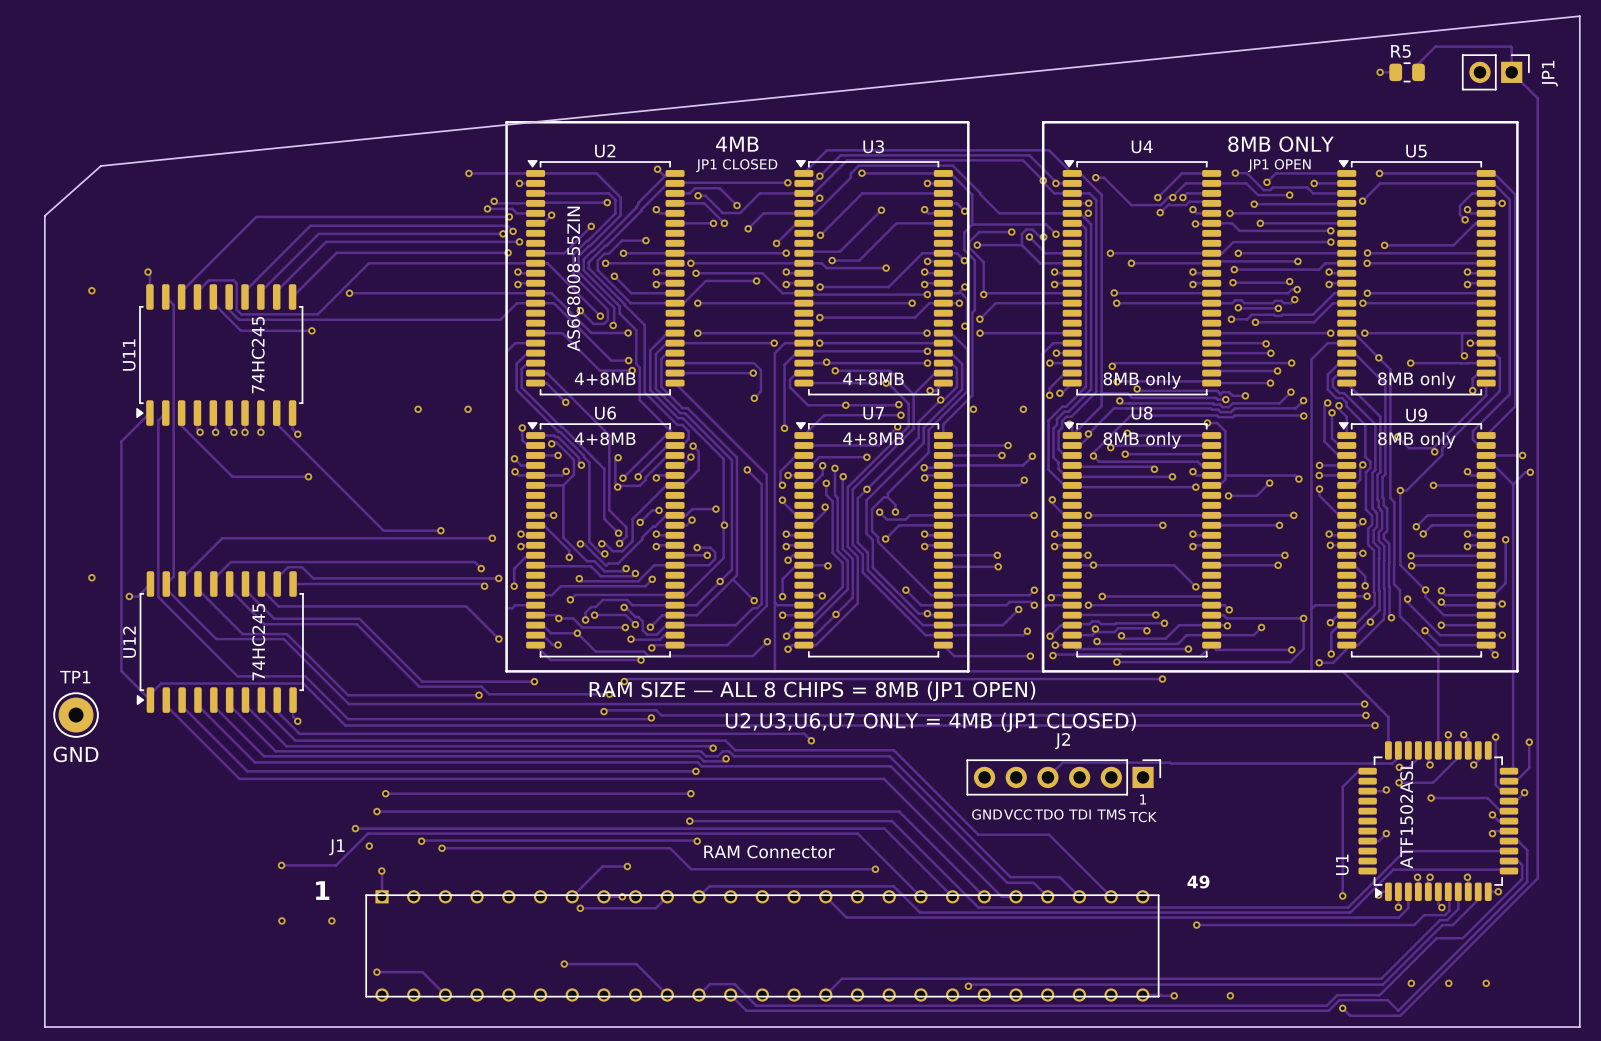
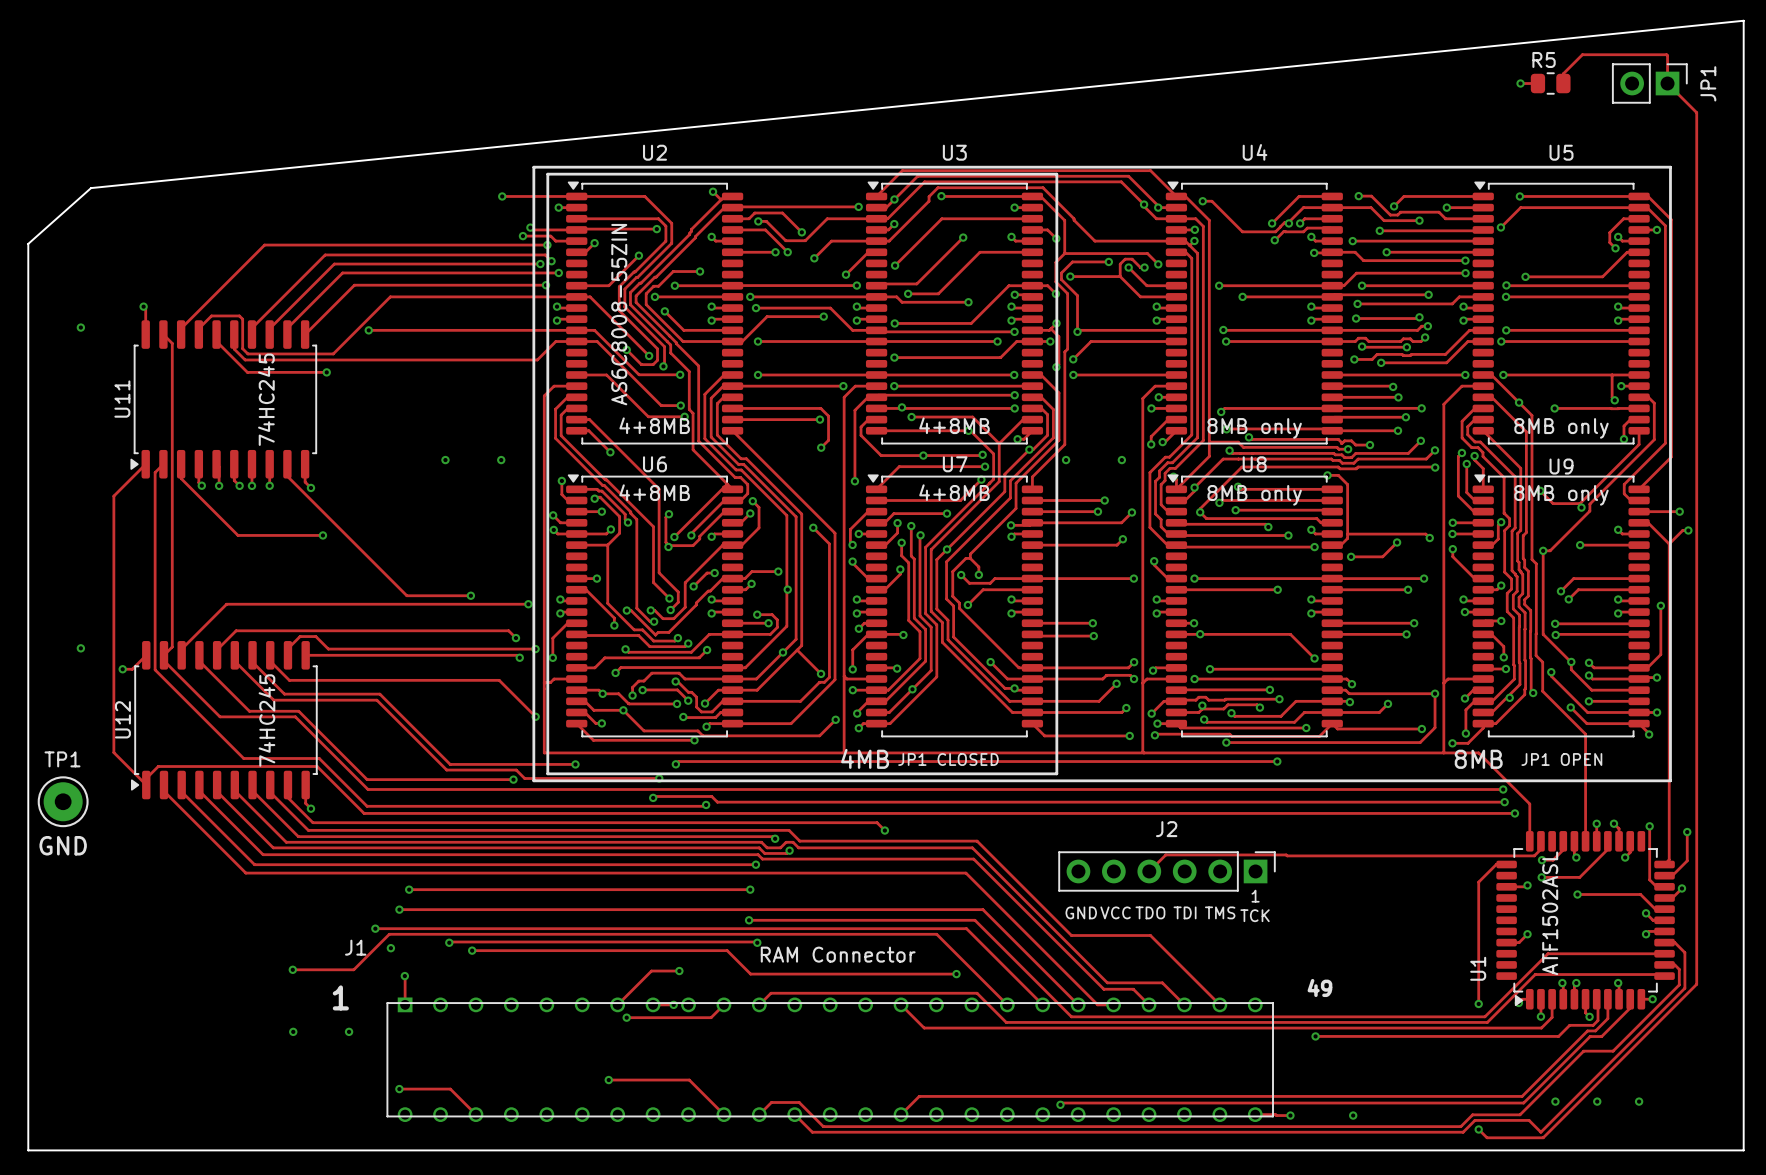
line: (506, 122) (968, 122) (968, 671) (506, 671) (506, 122) -> (547, 174) (547, 773) (1056, 773) (1056, 174) (547, 174)
line: (1043, 122) (1517, 122) (1517, 671) (1043, 671) (1043, 122) -> none
text: 4MB (737, 144) -> none
text: 8MB ONLY (1281, 144) -> none
U3 name position: U3 (873, 146) -> U3 (954, 152)
U4 name position: U4 (1142, 146) -> U4 (1255, 152)
line: none -> (533, 167) (1670, 167) (1670, 780) (533, 780) (533, 167)
U2 name position: U2 (605, 151) -> U2 (654, 152)
U5 name position: U5 (1416, 151) -> U5 (1561, 152)
text: JP1 CLOSED (736, 165) -> none
text: JP1 OPEN (1279, 165) -> none
text: none -> 4MB (865, 758)
text: none -> 8MB (1478, 759)
text: none -> JP1 CLOSED (948, 759)
text: none -> JP1 OPEN (1561, 759)
text: RAM SIZE — ALL 8 CHIPS = 8MB (JP1 OPEN) (812, 691) -> none
text: U2,U3,U6,U7 ONLY = 4MB (JP1 CLOSED) (930, 722) -> none

